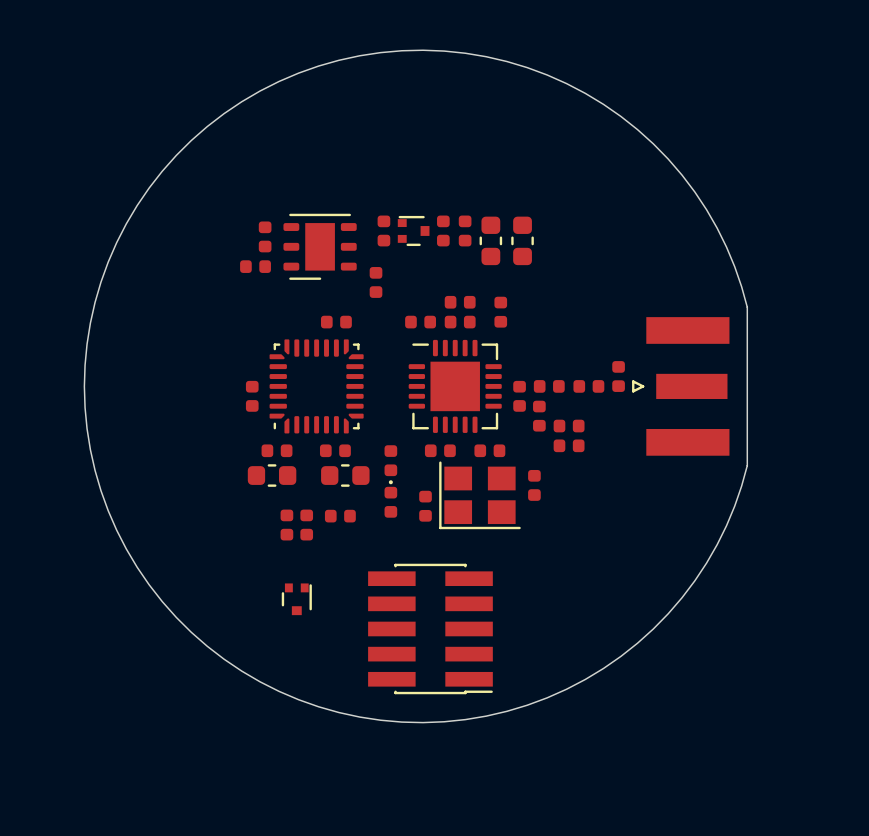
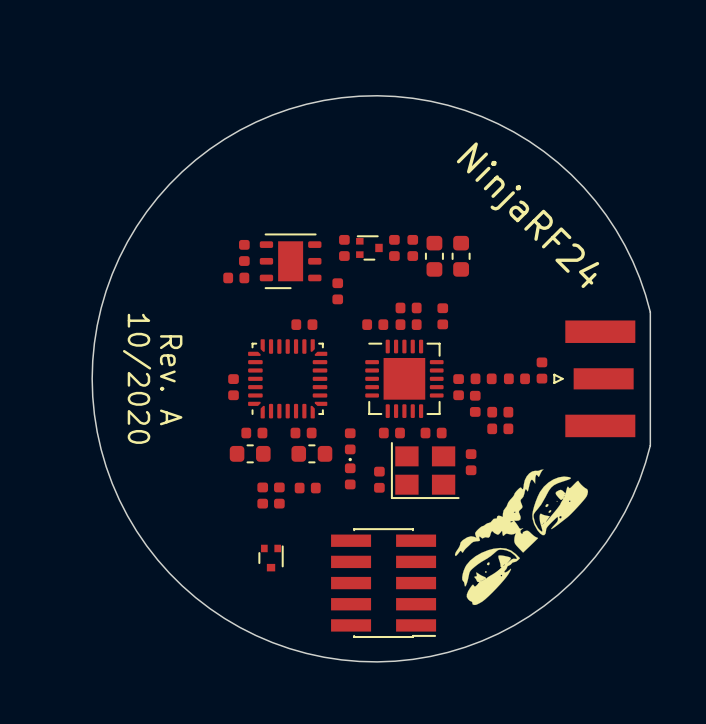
text: none -> NinjaRF24 (528, 215)
text: none -> 10/2020 (137, 378)
text: none -> Rev. A (171, 380)
drawing: none -> [454, 469, 589, 606]

